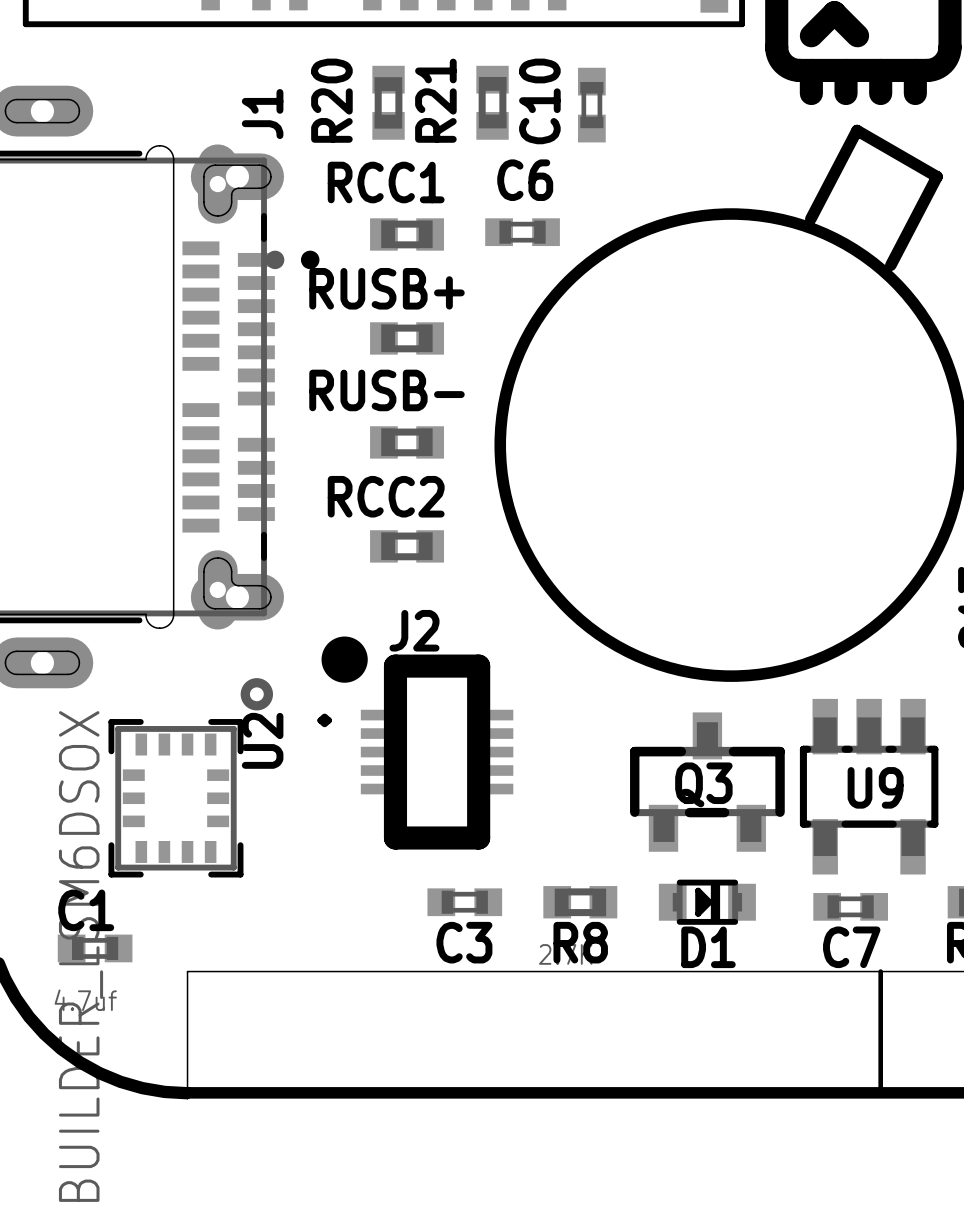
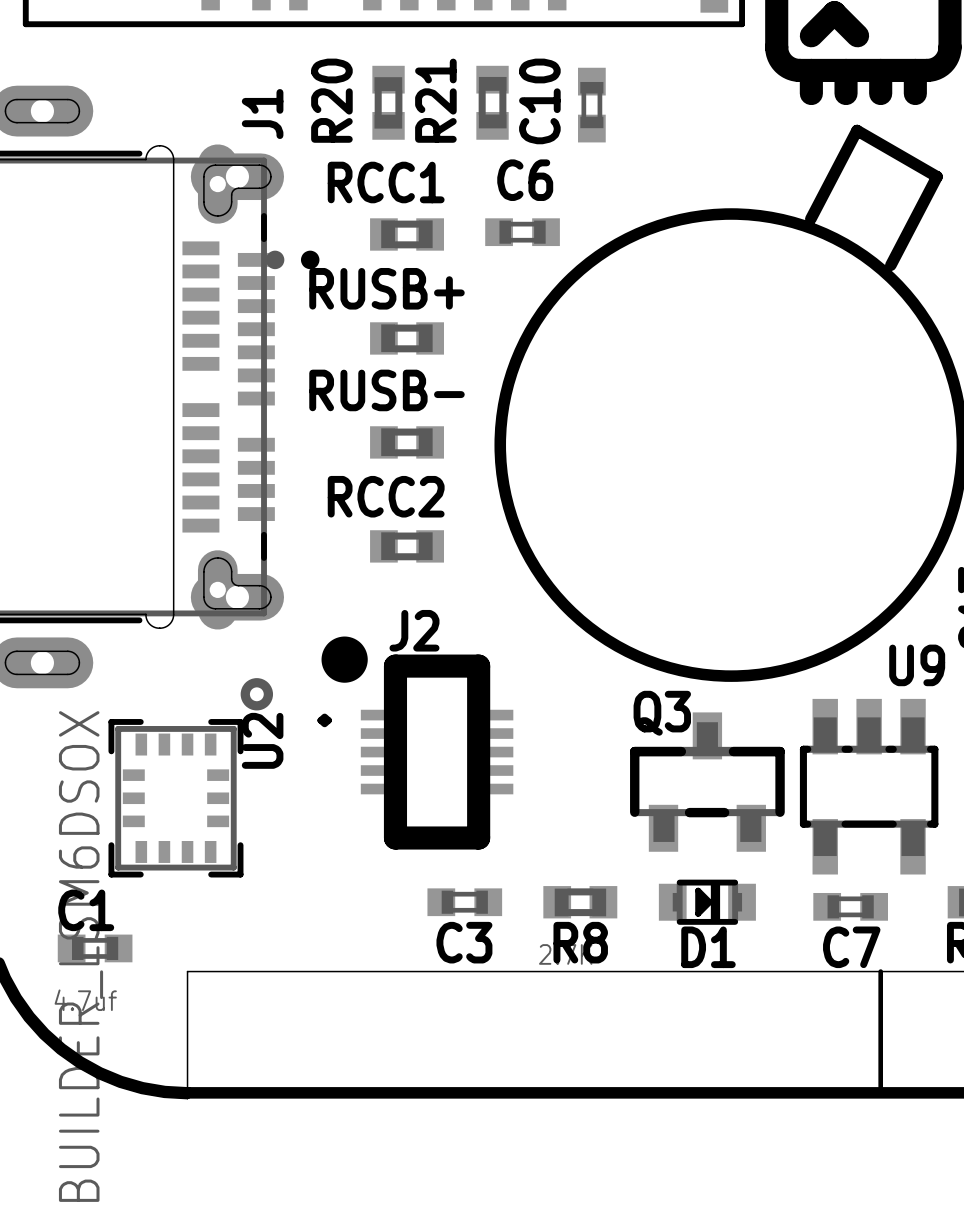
Q3 name position: Q3 (703, 784) -> Q3 (662, 713)
text position: U9 (875, 787) -> U9 (917, 665)

